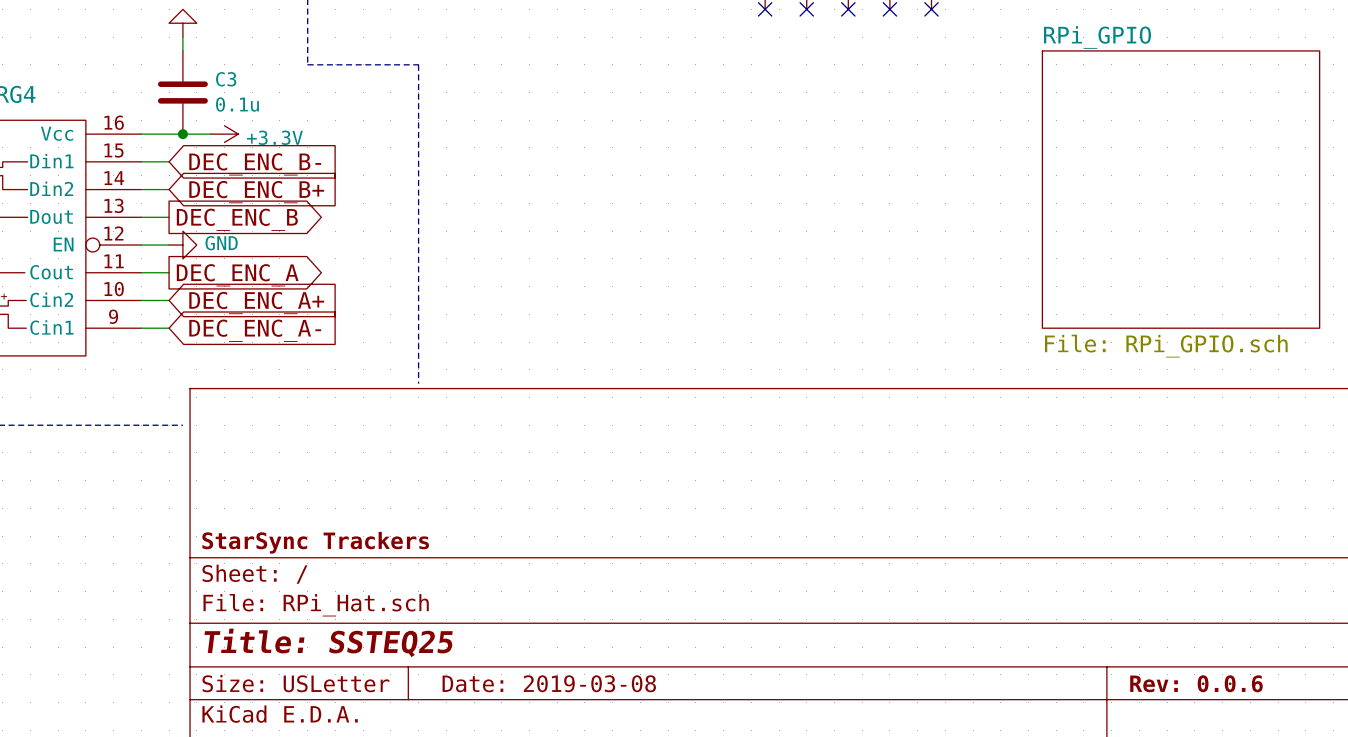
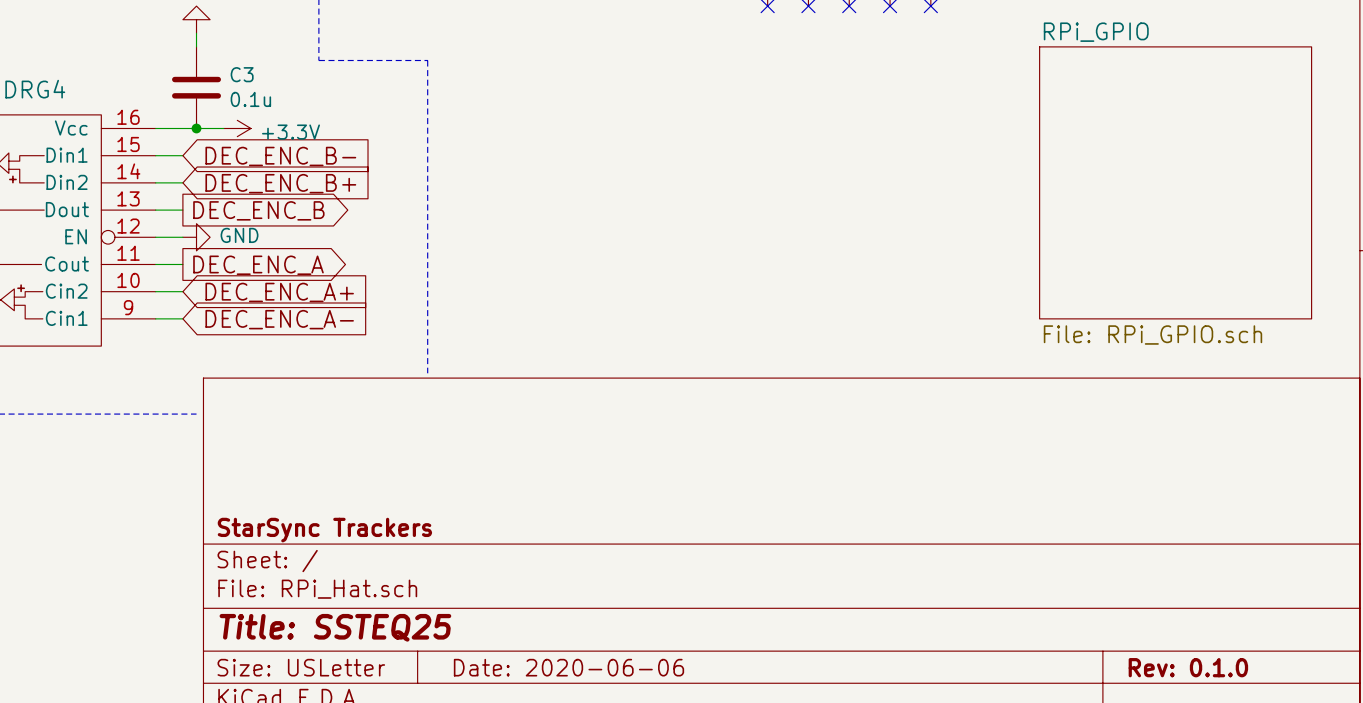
title block: Date: 2019-03-08 (549, 683) -> Date: 2020-06-06 (568, 667)
title block: Rev: 0.0.6 (1196, 683) -> Rev: 0.1.0 (1188, 667)

